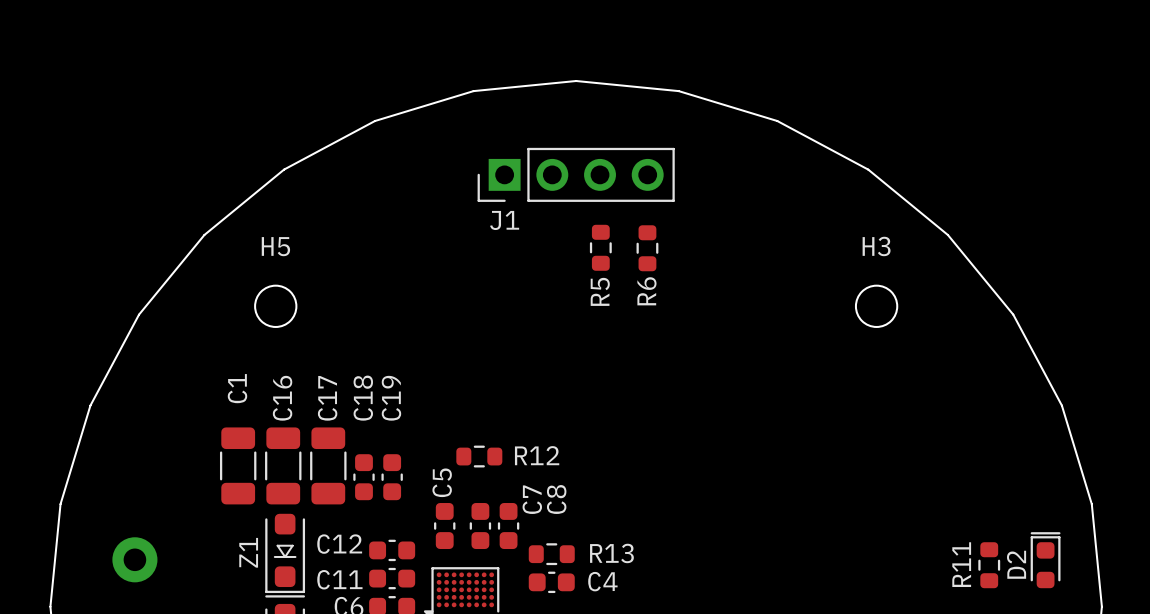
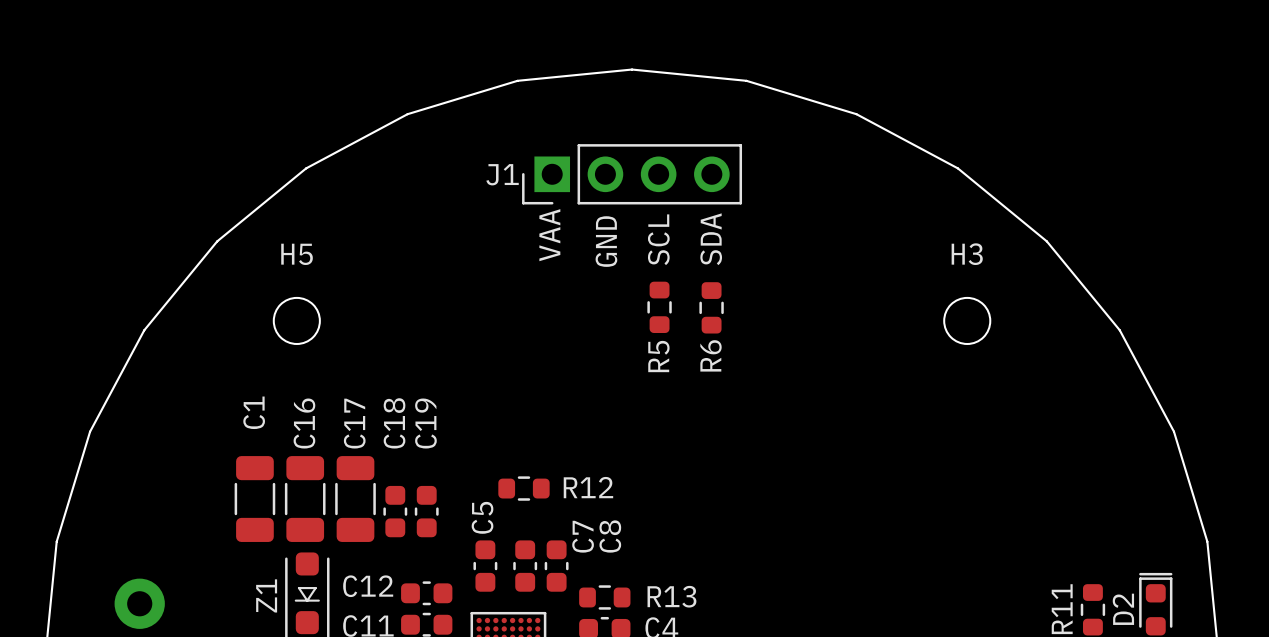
J1 name position: J1 (504, 220) -> J1 (502, 174)
text: none -> VAA (549, 235)
text: none -> SCL (658, 239)
text: none -> SDA (711, 239)
text: none -> GND (606, 241)
R5 position: (600, 247) -> (659, 307)
R6 position: (647, 248) -> (711, 307)

